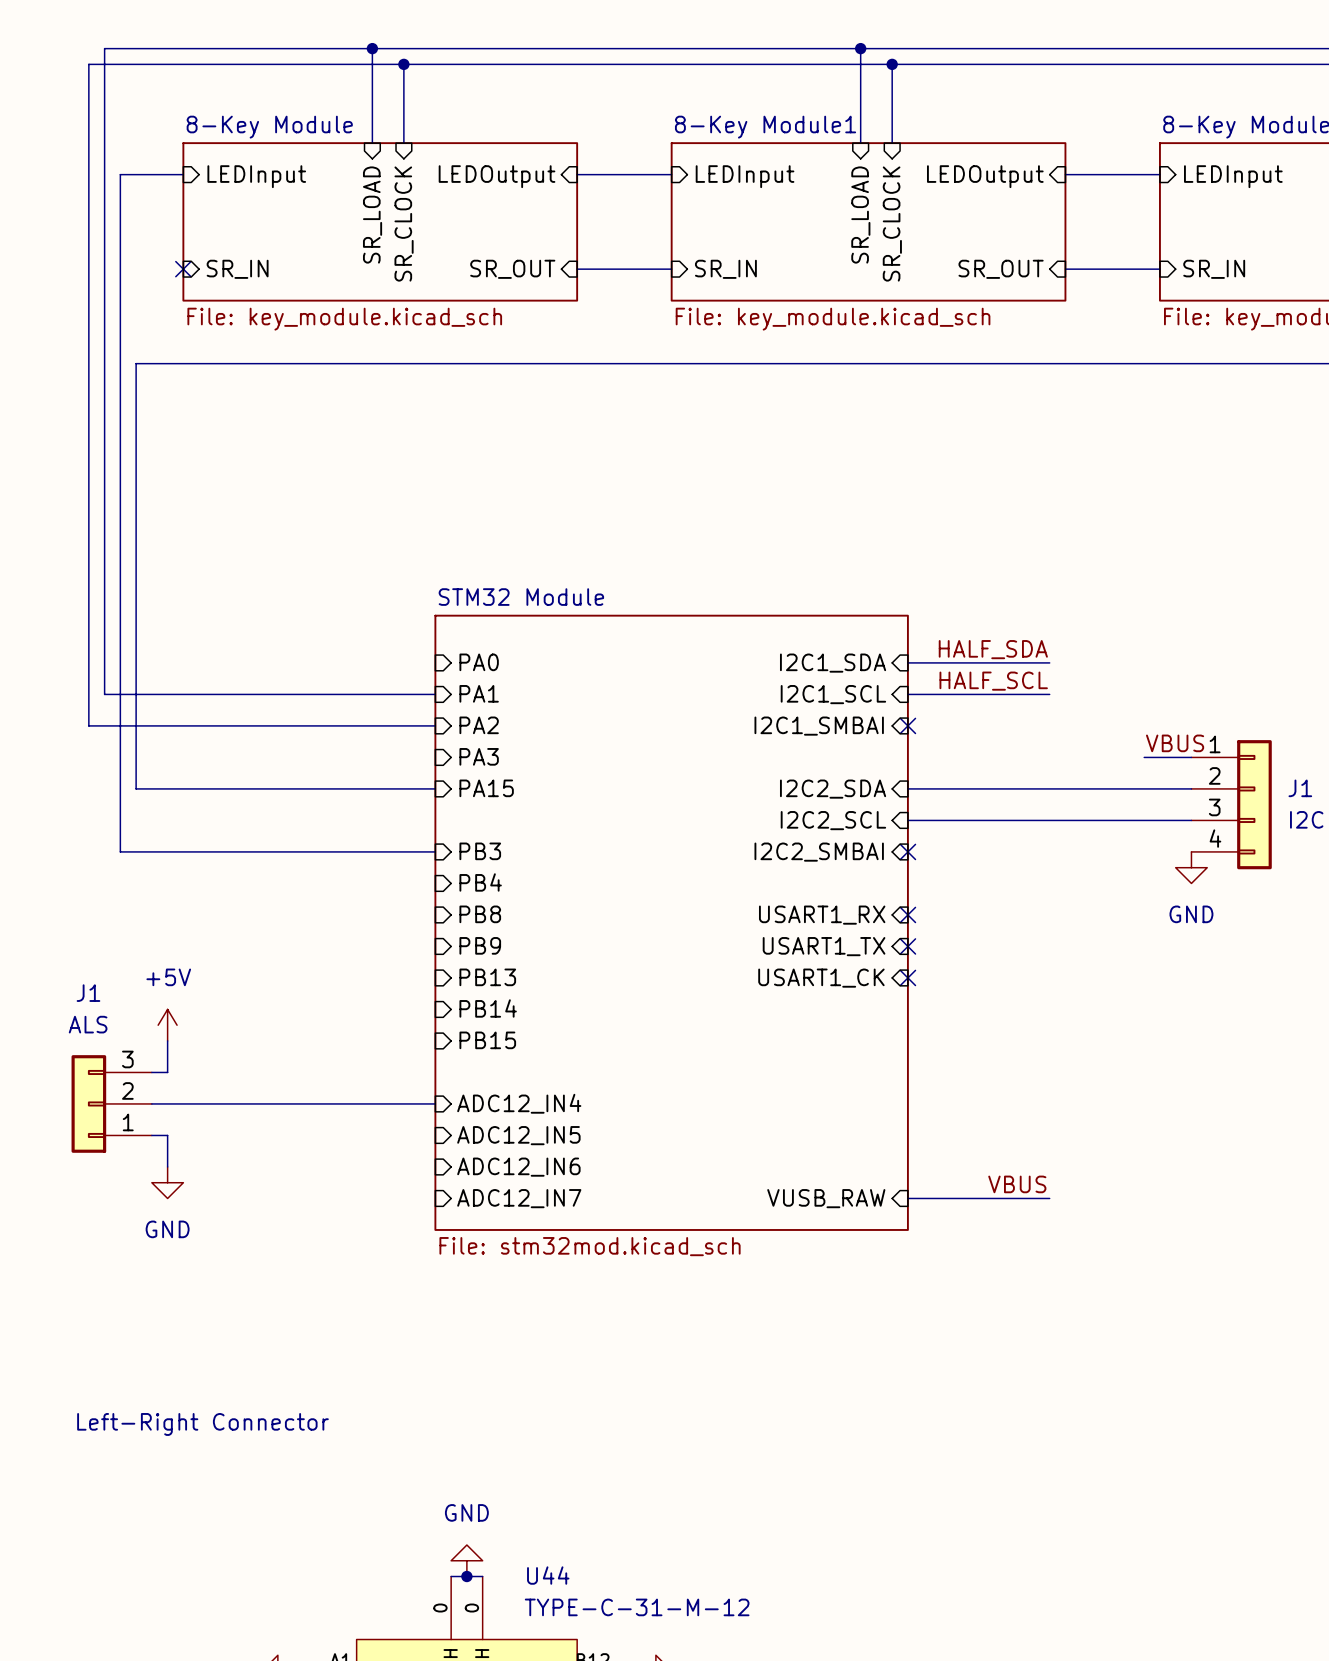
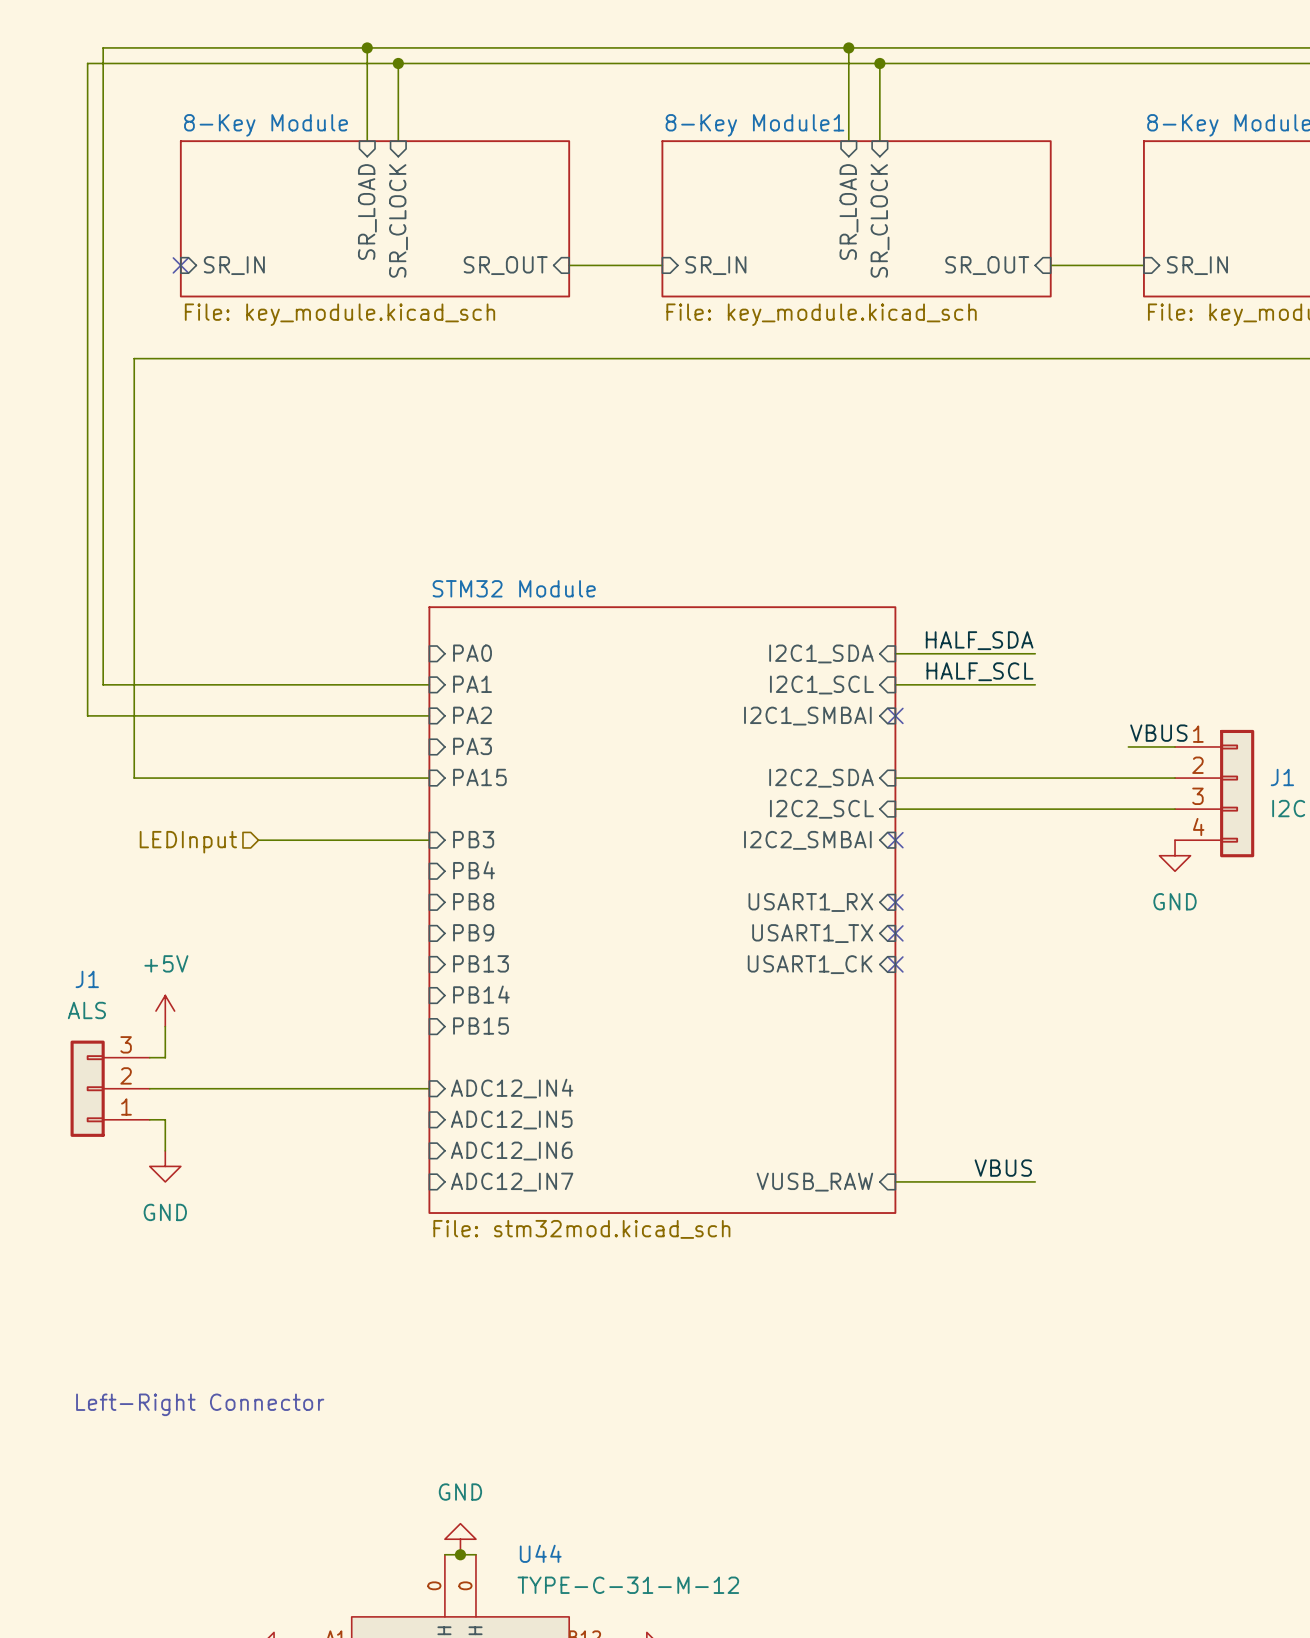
wire: (183, 174) (120, 174) (120, 851) (262, 851) -> none
wire: (577, 174) (671, 174) -> none
wire: (1065, 174) (1159, 174) -> none
sheet pin: LEDInput (256, 176) -> none
sheet pin: LEDOutput (497, 176) -> none
sheet pin: LEDInput (745, 176) -> none
sheet pin: LEDOutput (985, 176) -> none
sheet pin: LEDInput (1233, 176) -> none
hierarchical label: none -> LEDInput (188, 842)

